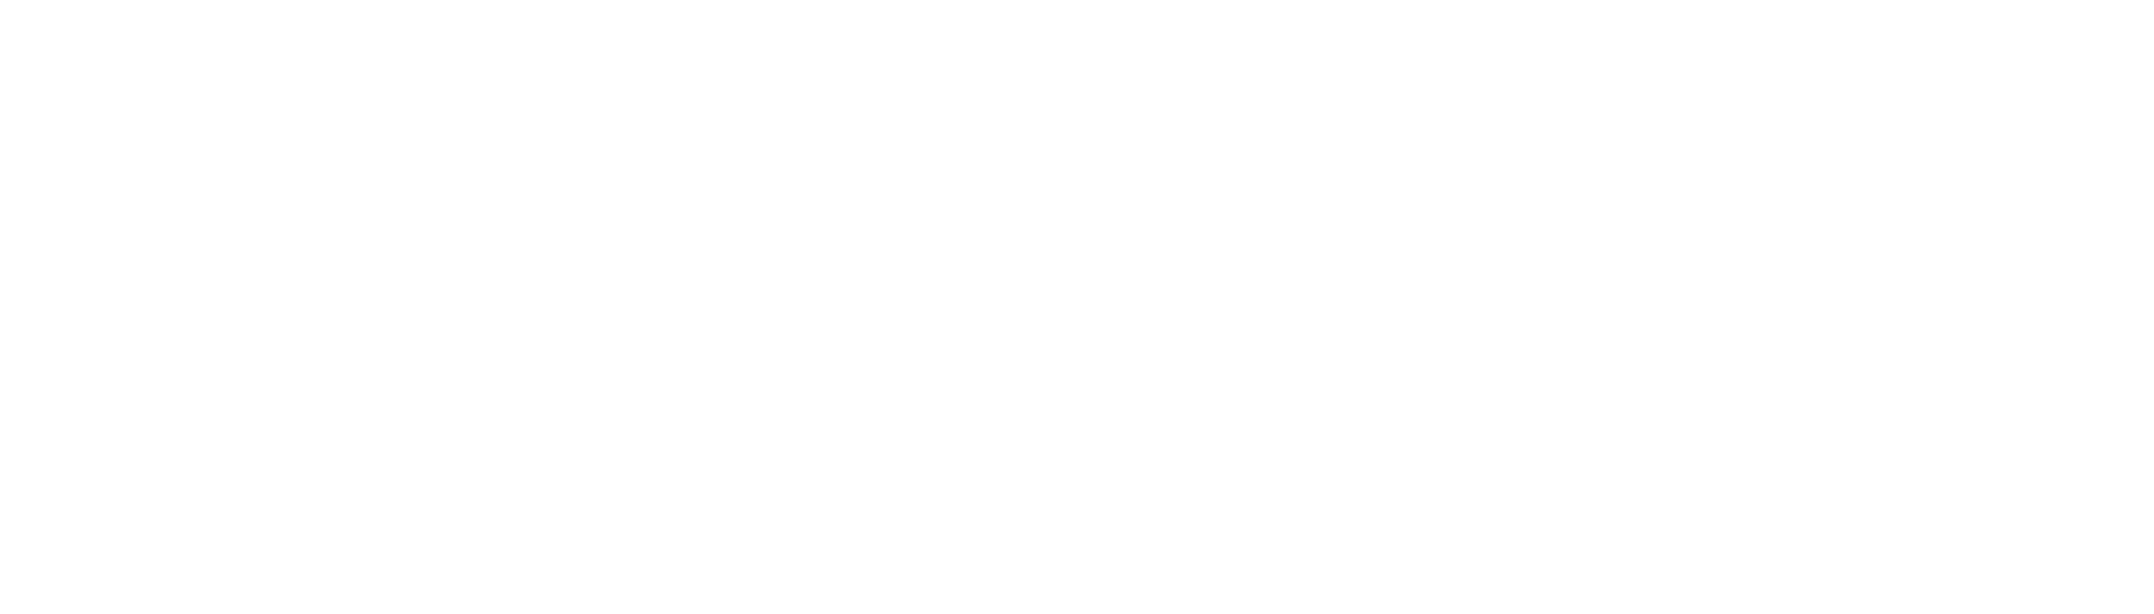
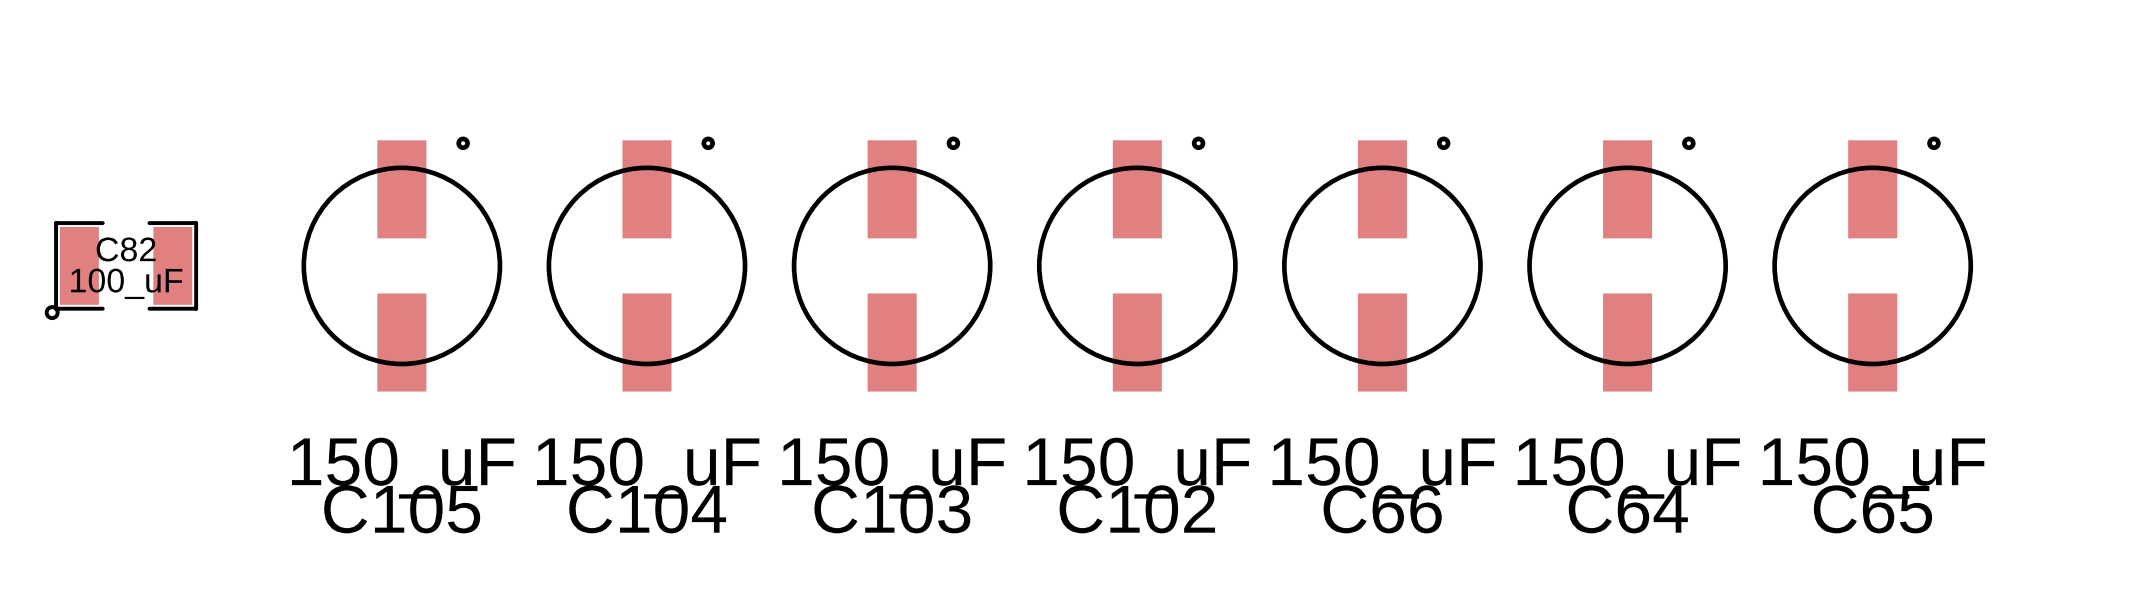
C105: none -> 150_uF (401, 264)
C104: none -> 150_uF (646, 264)
C103: none -> 150_uF (892, 264)
C102: none -> 150_uF (1137, 264)
C66: none -> 150_uF (1382, 264)
C64: none -> 150_uF (1627, 264)
C65: none -> 150_uF (1872, 264)
C82: none -> 100_uF (121, 270)

